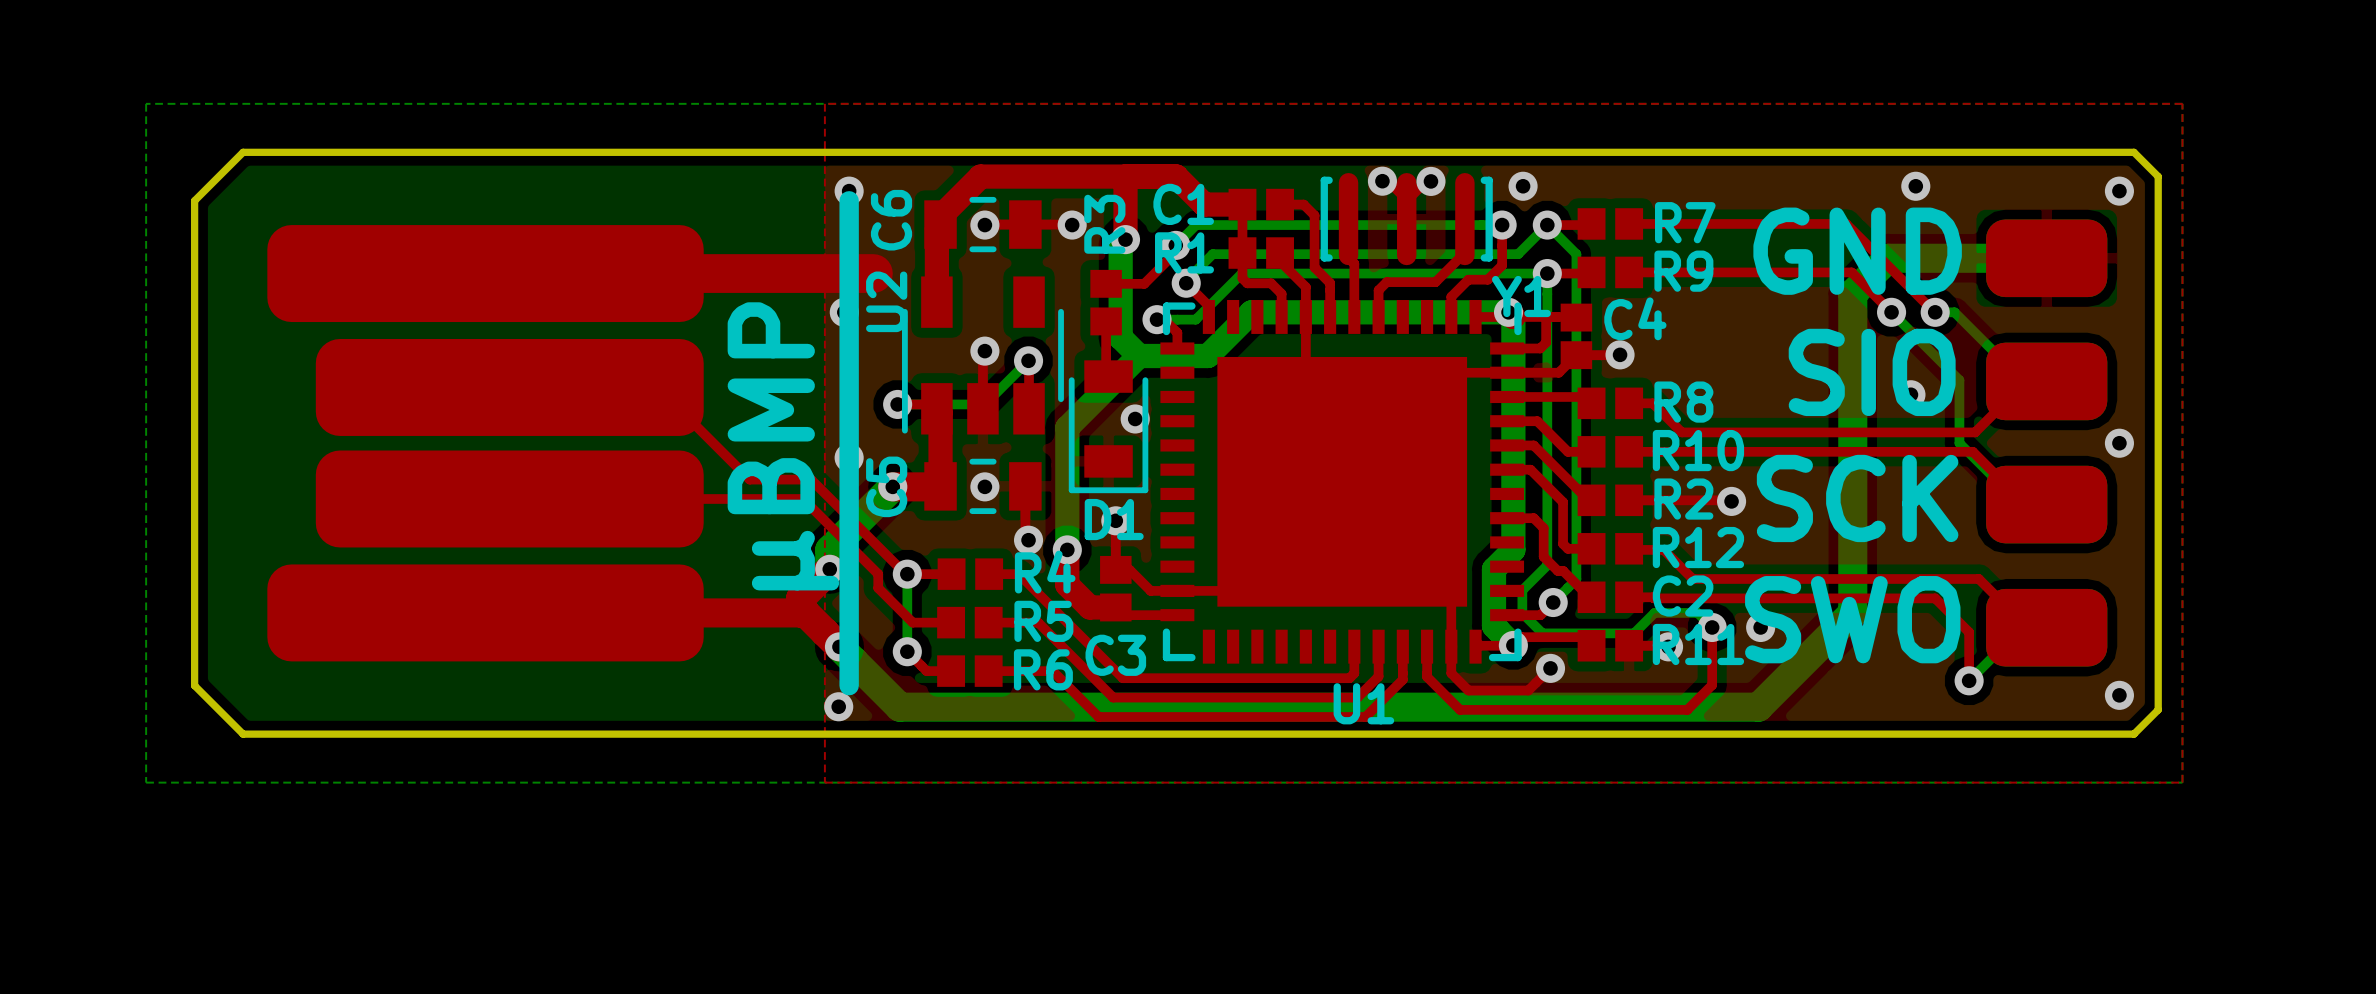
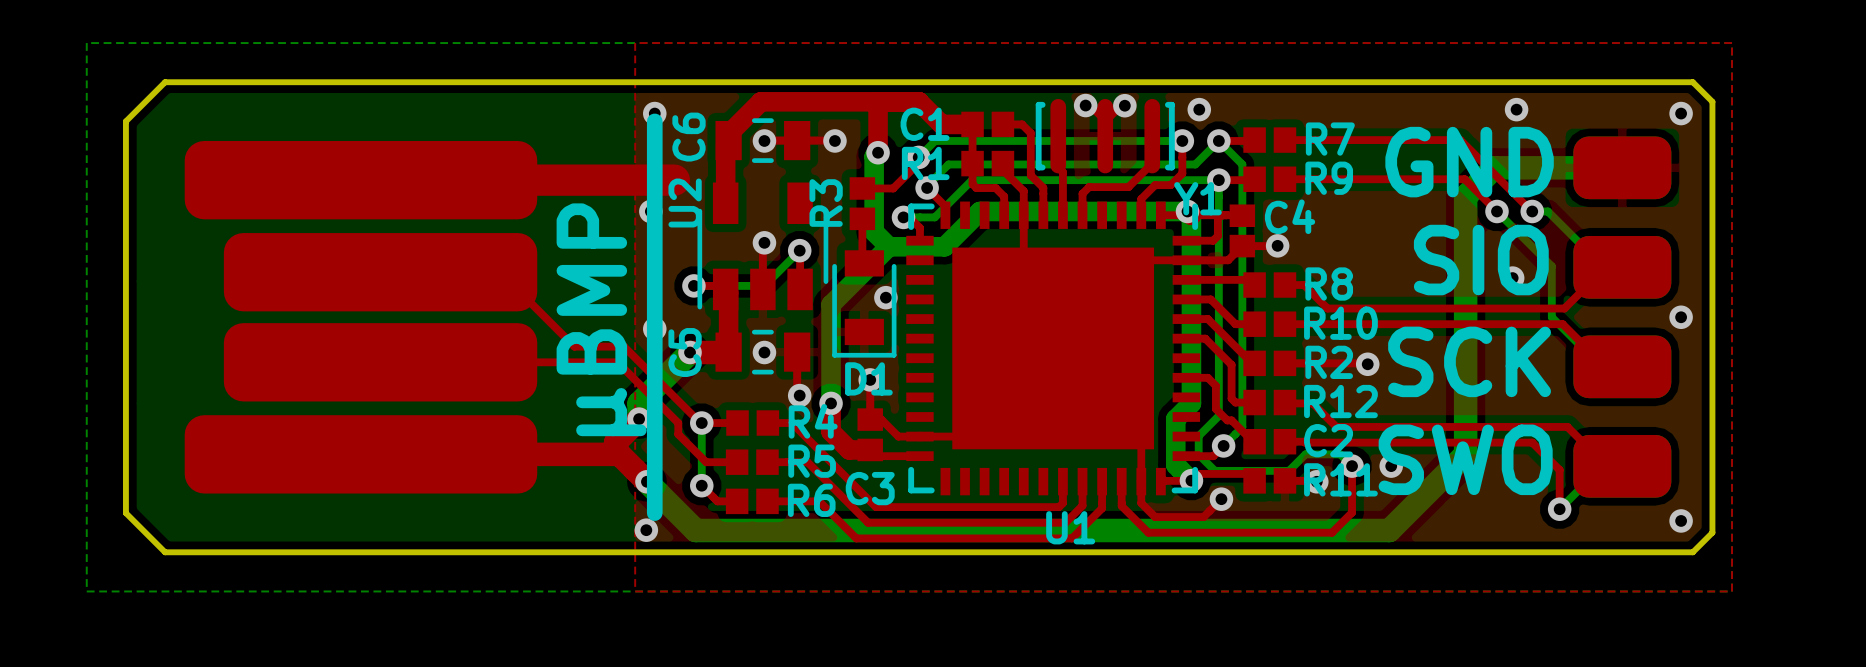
R3 name position: R3 (1104, 224) -> R3 (826, 203)

